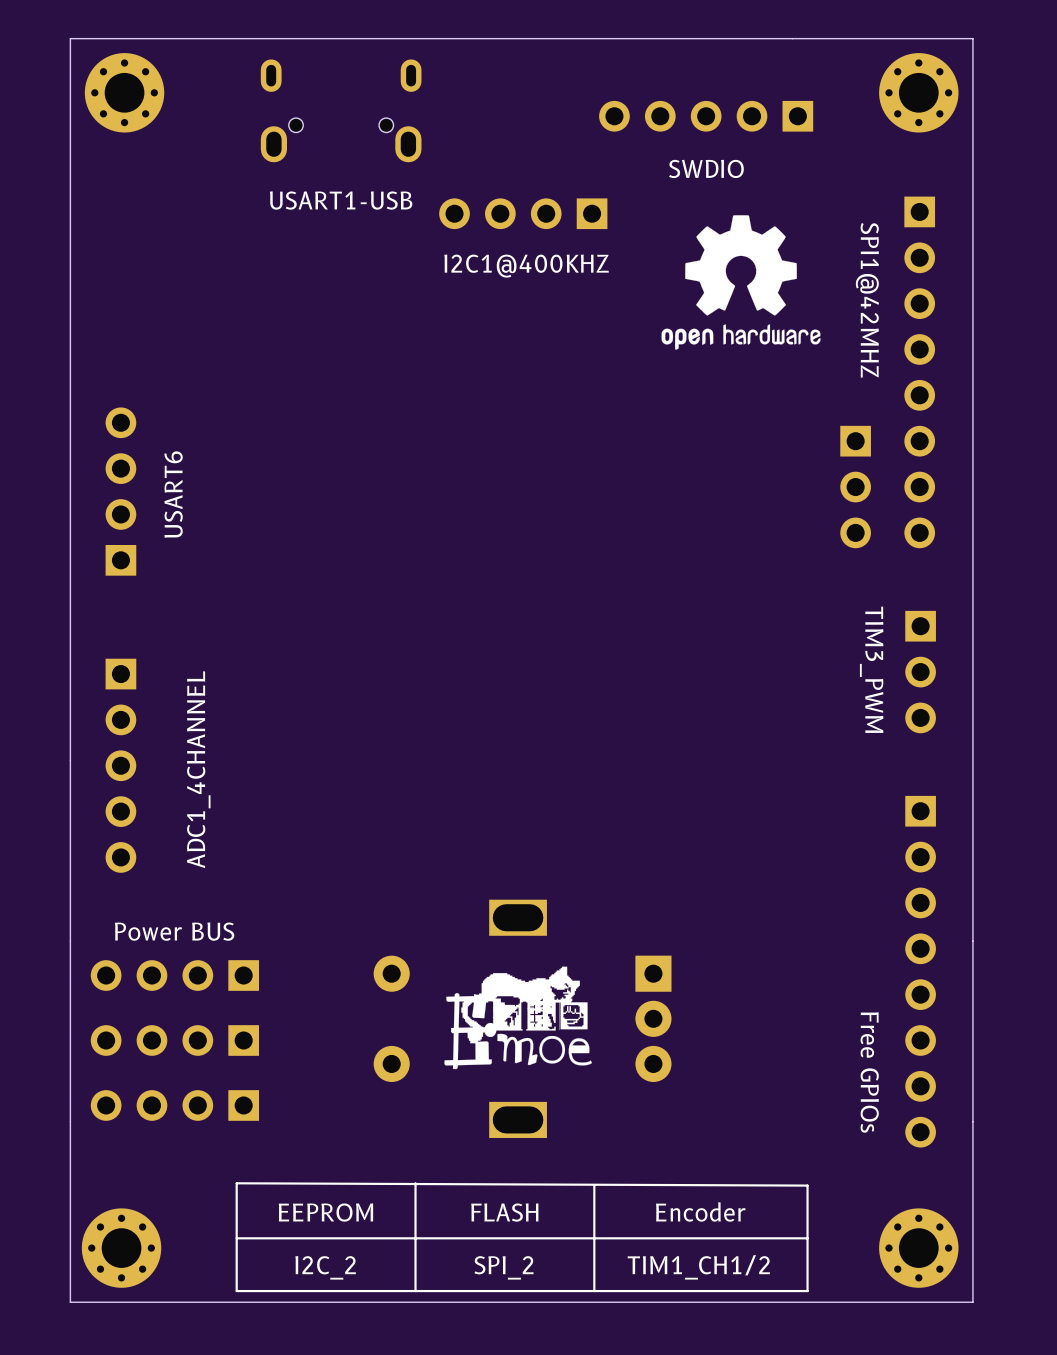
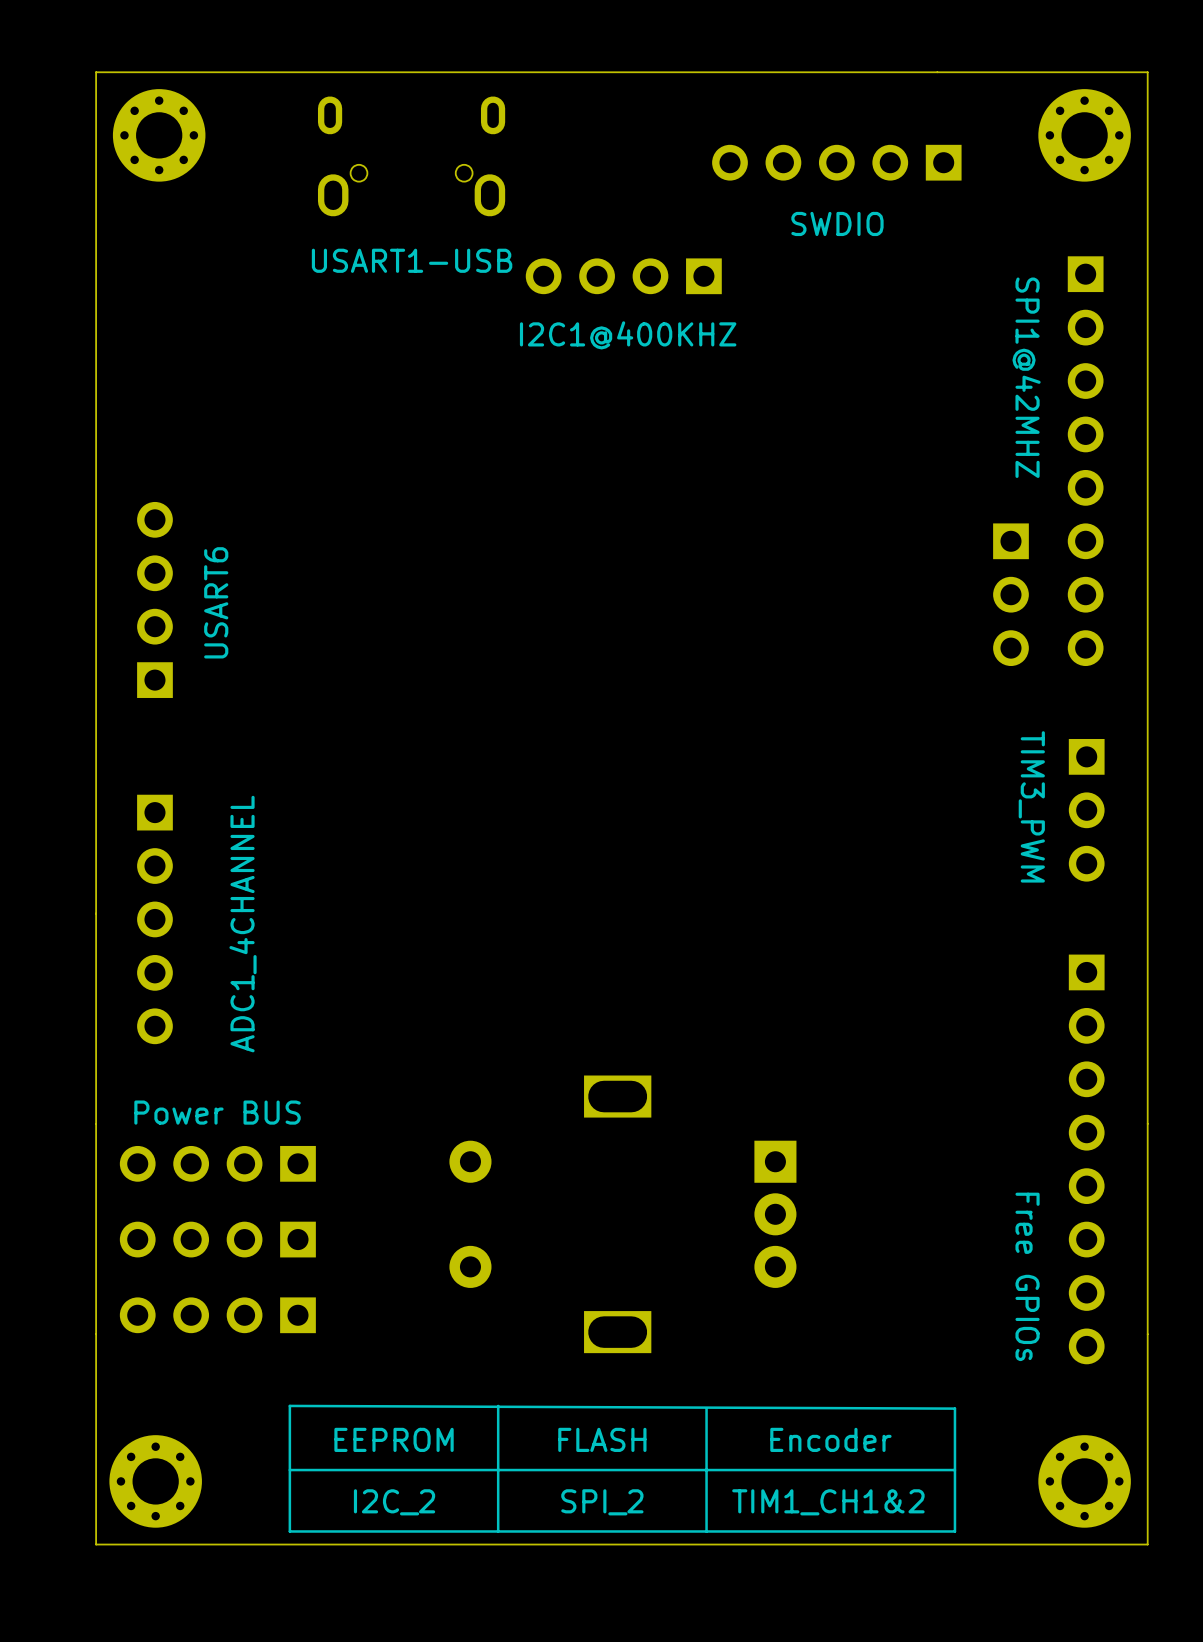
drawing: [661, 215, 821, 350] -> none
drawing: [444, 966, 592, 1070] -> none
text: TIM1_CH1/2 (698, 1267) -> TIM1_CH1&2 (828, 1502)

